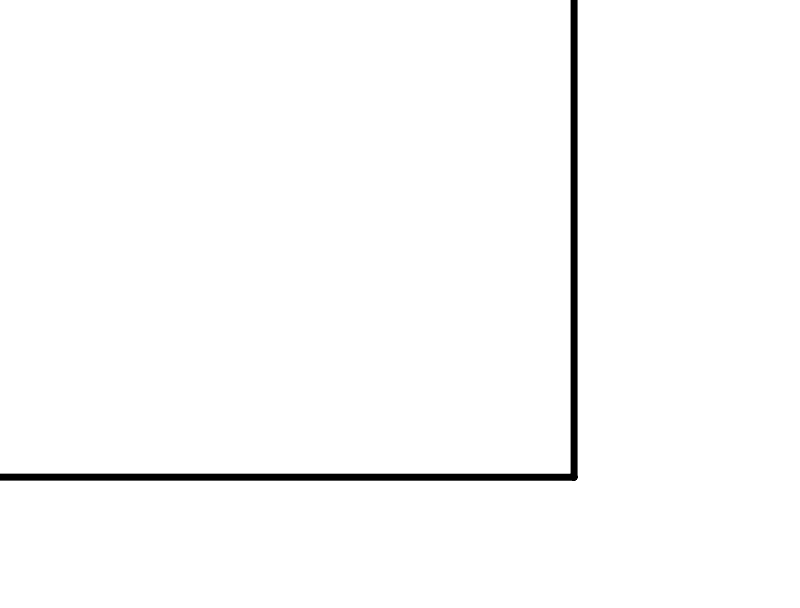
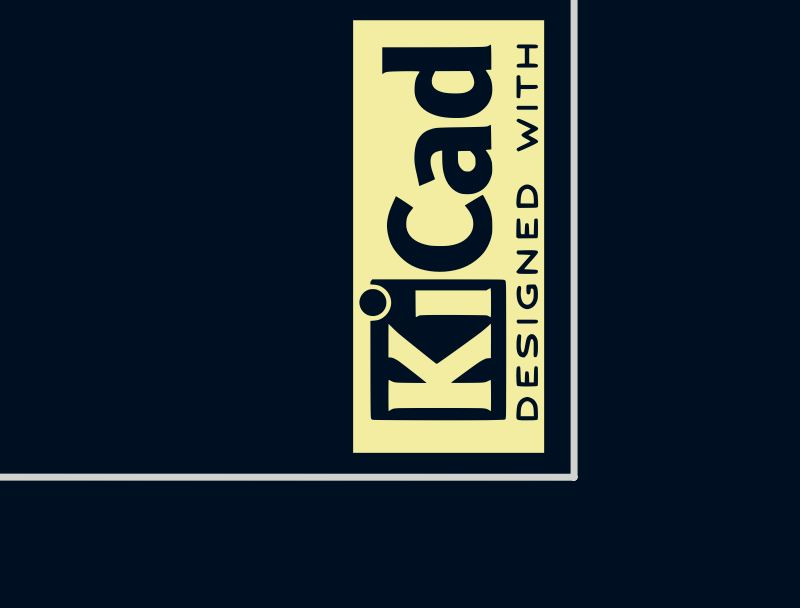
drawing: none -> [353, 20, 545, 453]

